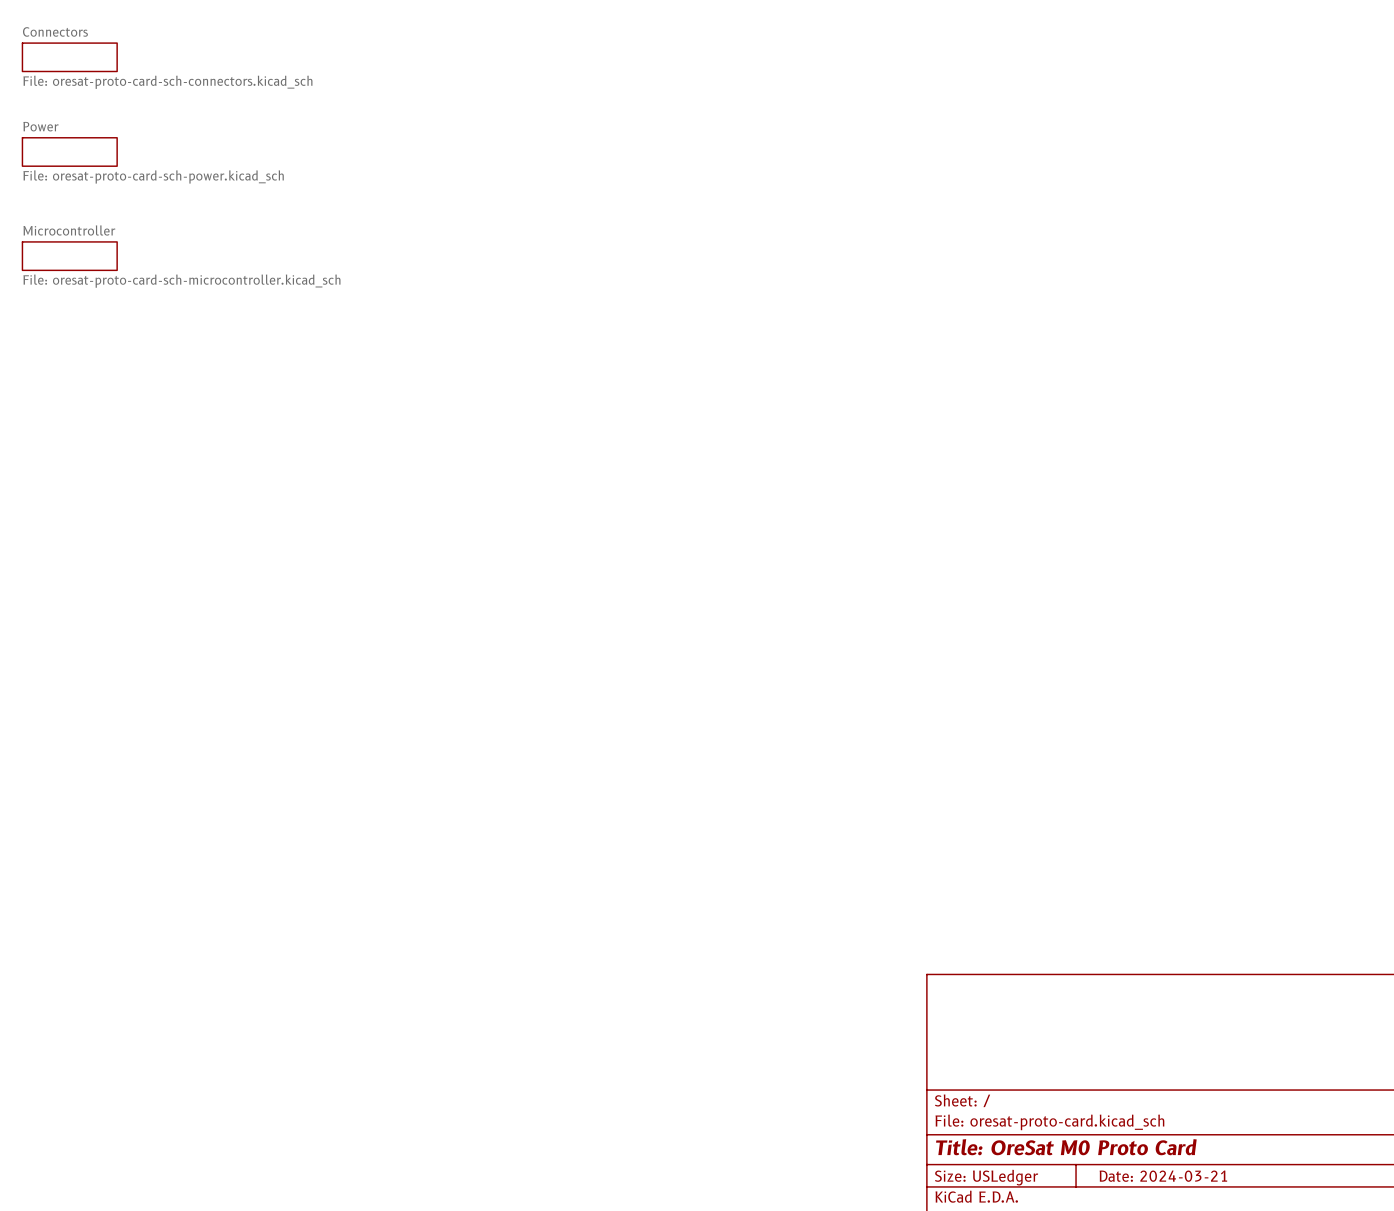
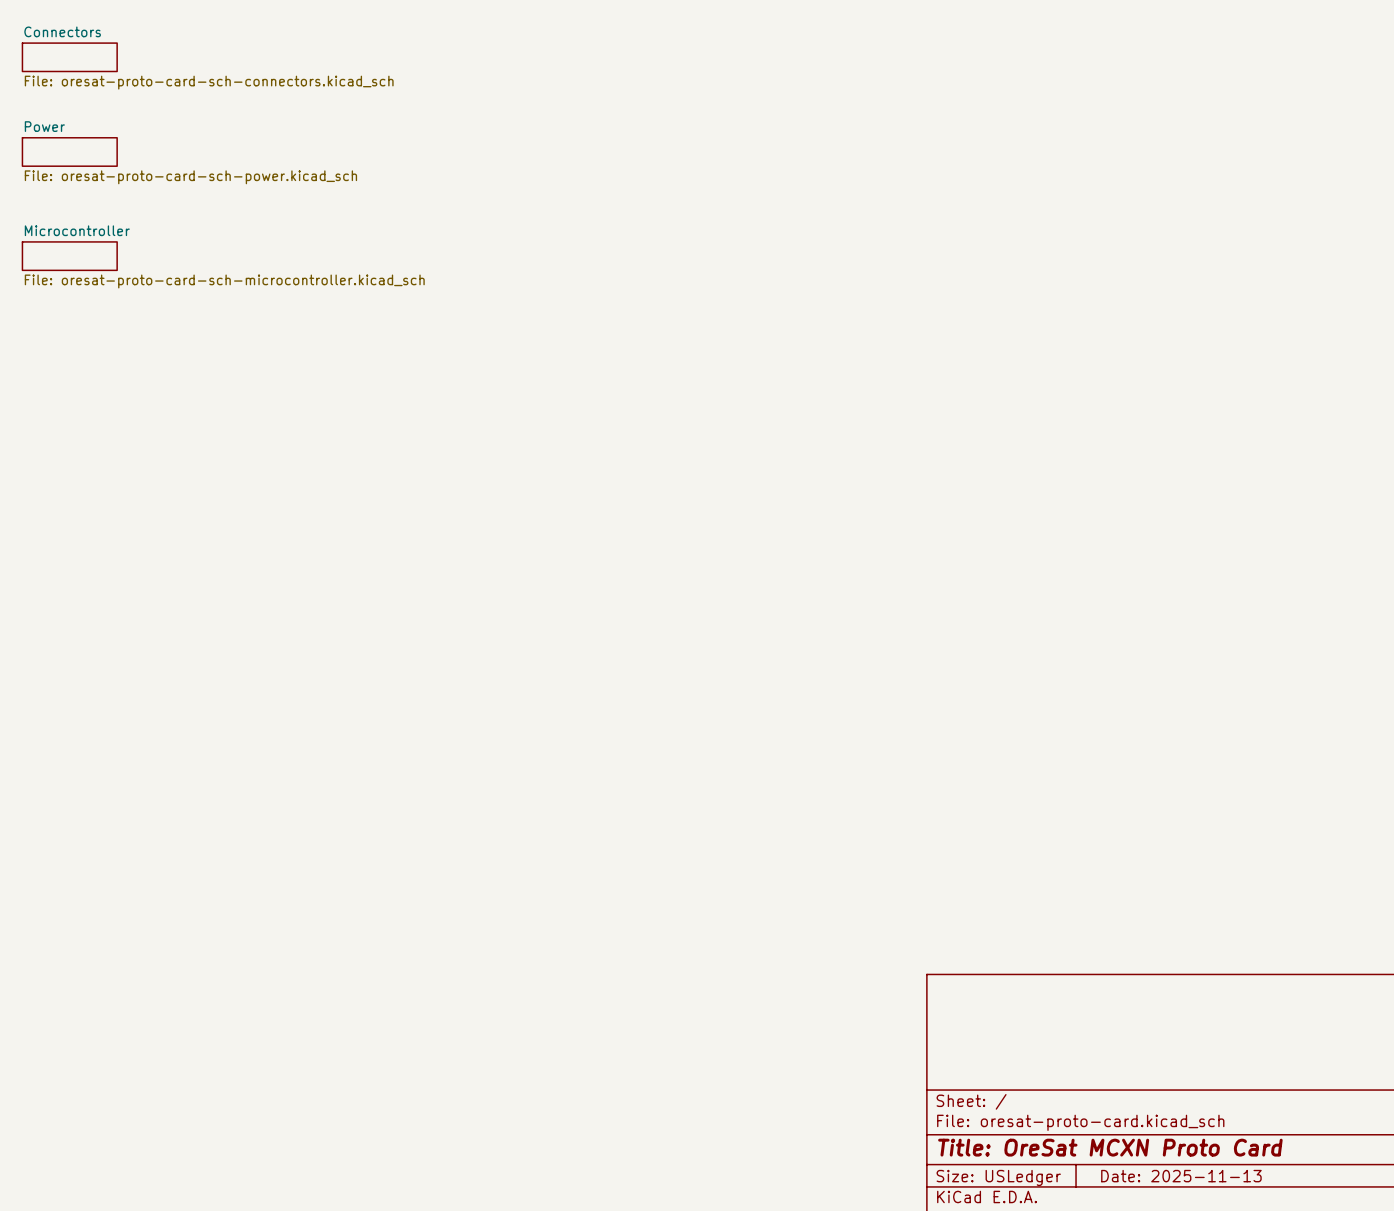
title block: Title: OreSat M0 Proto Card (1066, 1147) -> Title: OreSat MCXN Proto Card (1110, 1147)
title block: Date: 2024-03-21 (1163, 1176) -> Date: 2025-11-13 (1181, 1176)

